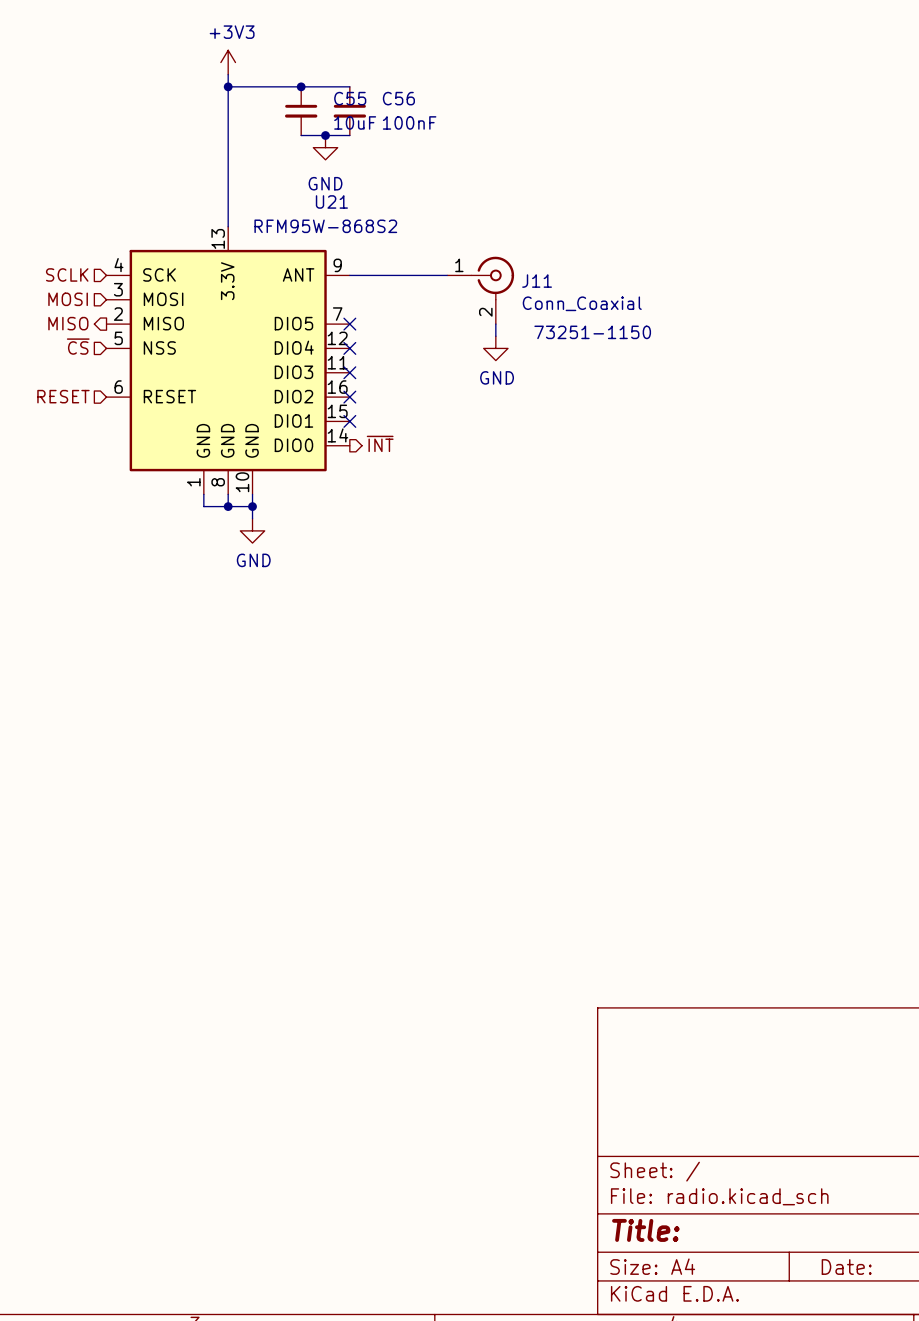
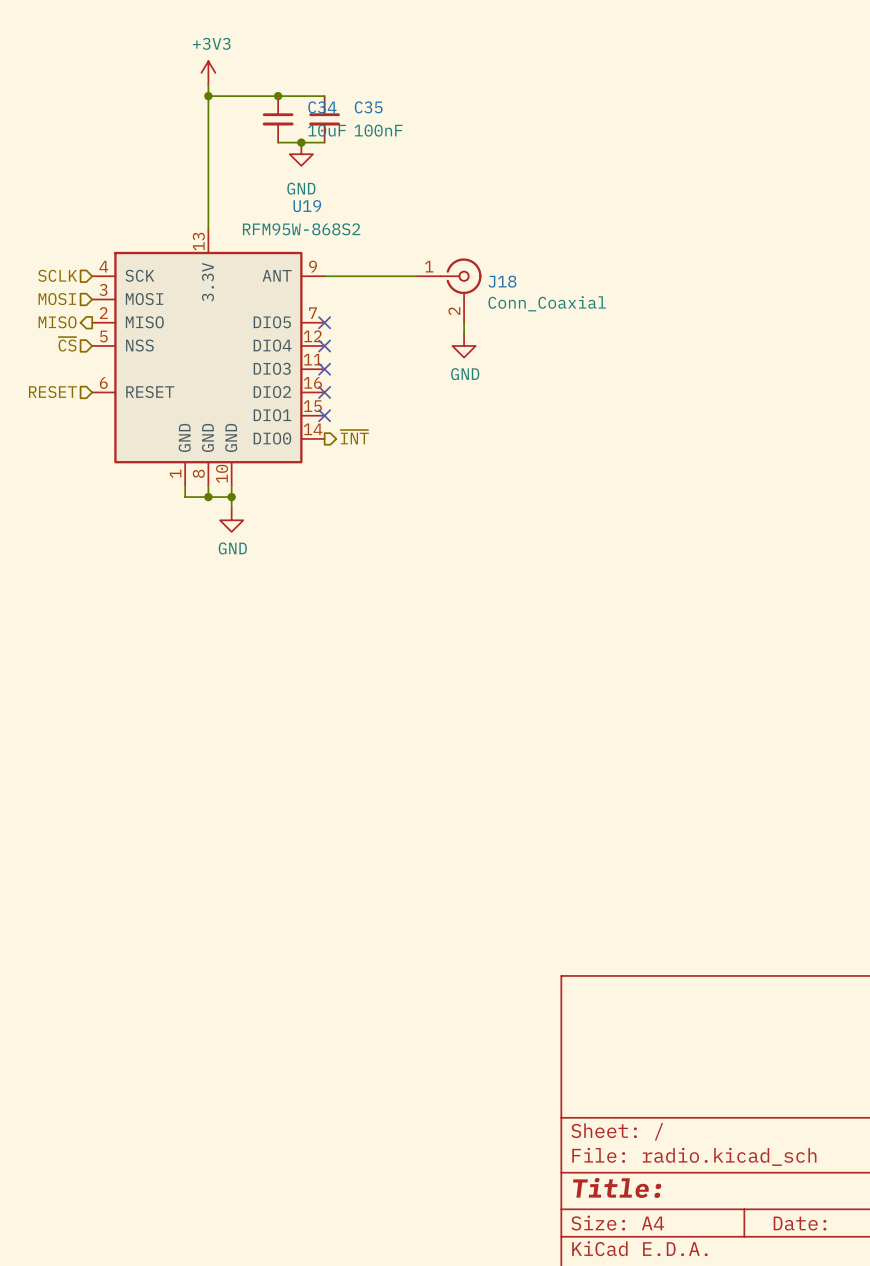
C55 name: C55 (350, 98) -> C34 (322, 107)
C56 name: C56 (398, 98) -> C35 (368, 107)
U21 name: U21 (331, 201) -> U19 (307, 206)
J11 name: J11 (537, 281) -> J18 (502, 281)
text: 73251-1150 (592, 332) -> none

